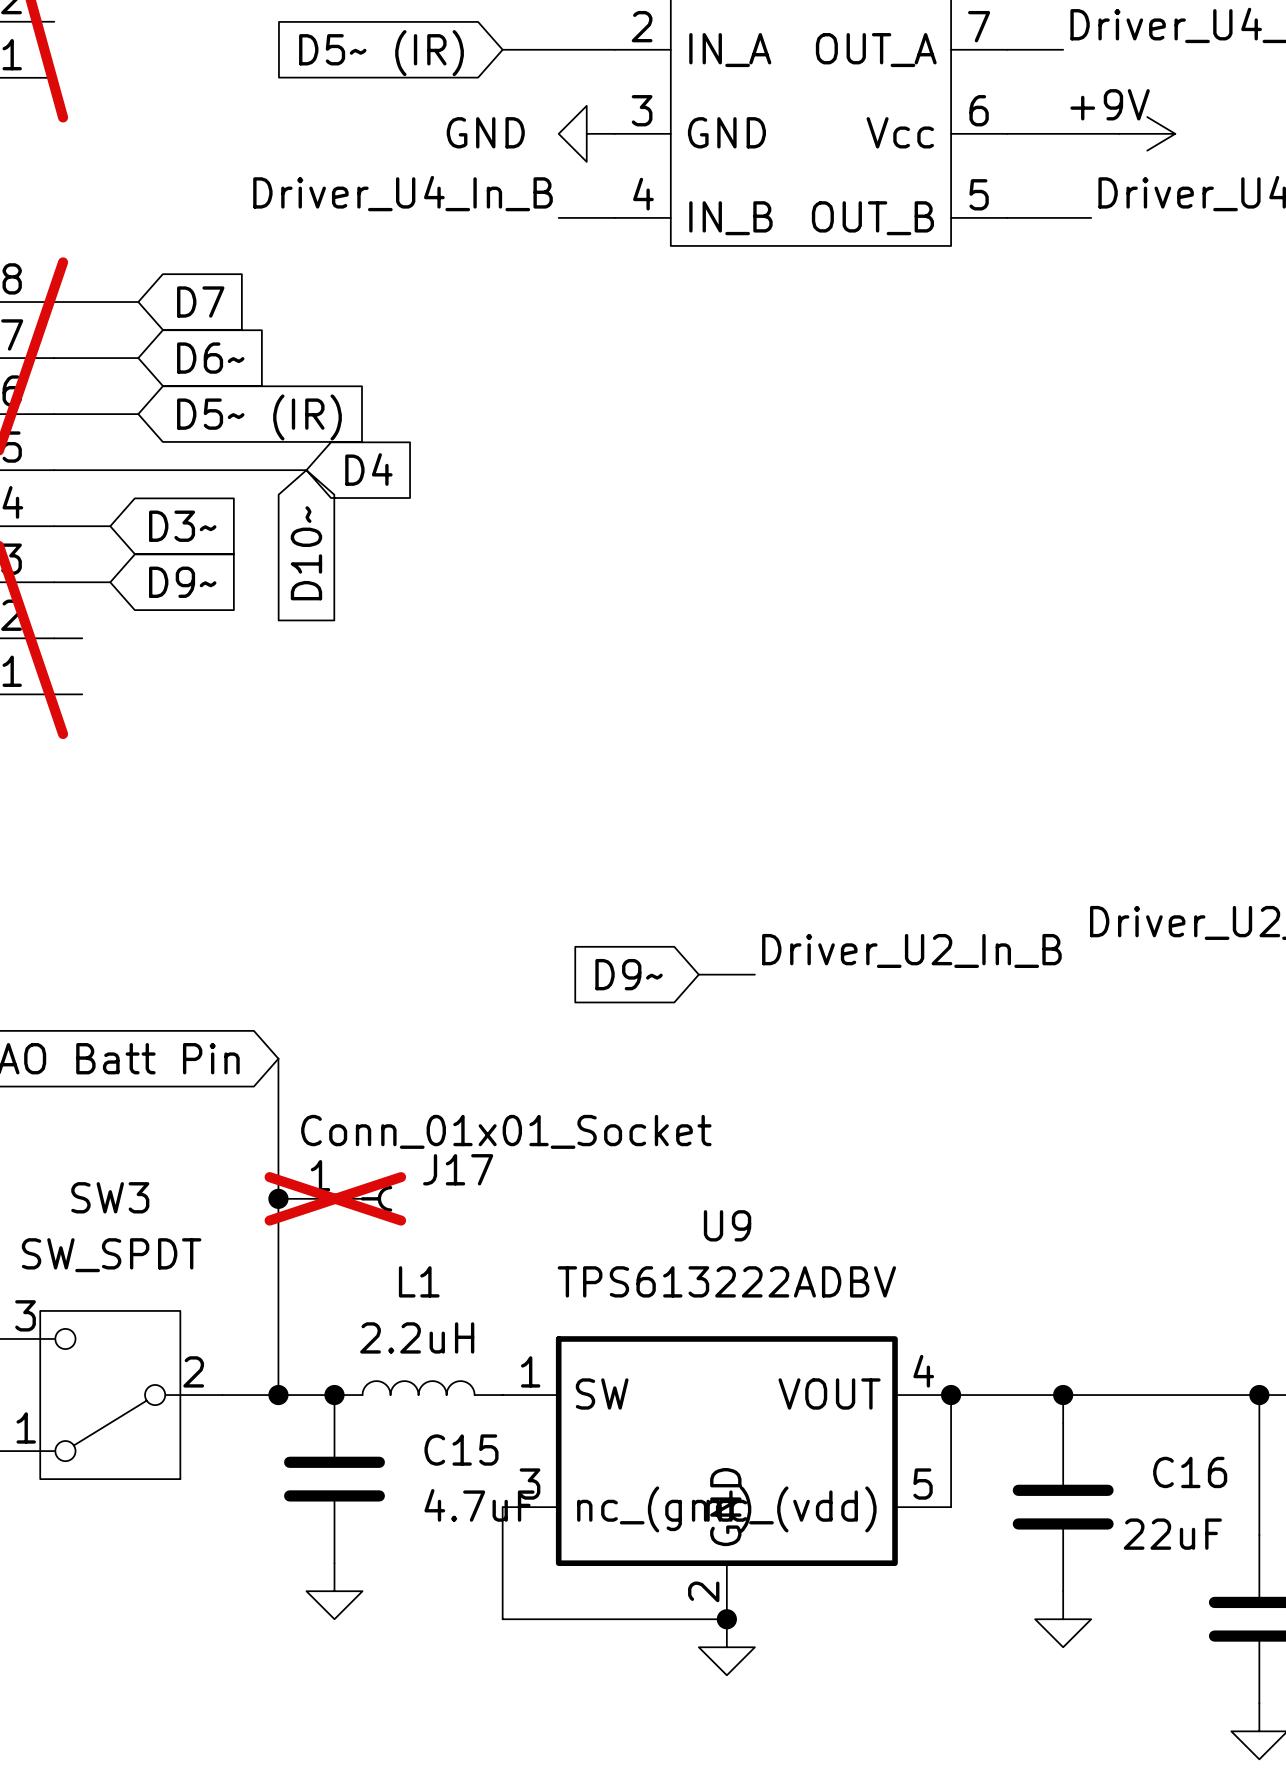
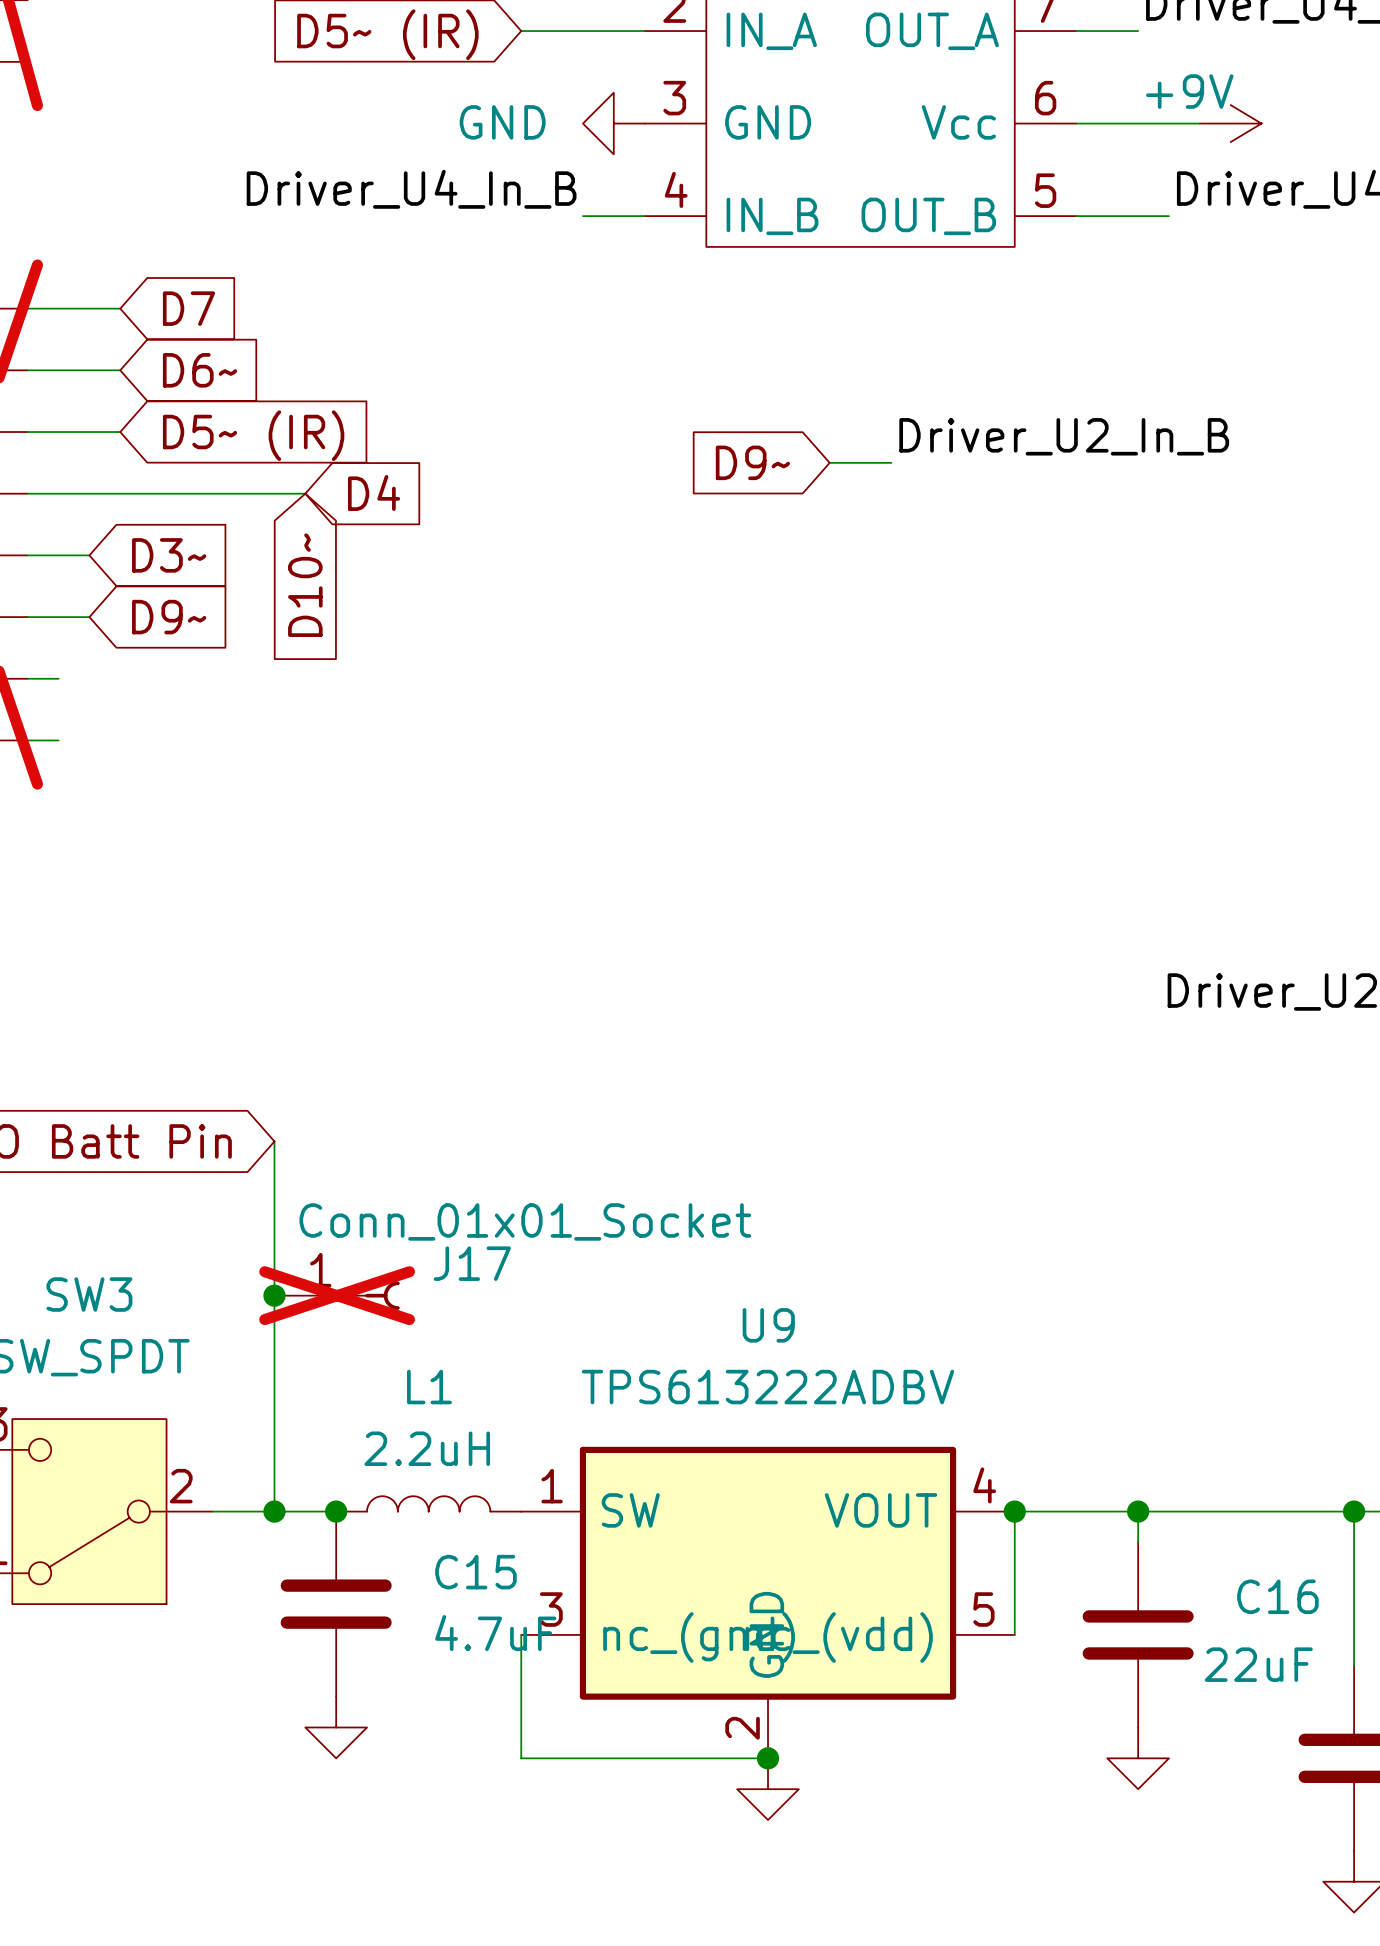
label position: Driver_U2_In_B (911, 950) -> Driver_U2_In_B (1064, 436)
global label position: D9~ (629, 974) -> D9~ (752, 462)
wire: (698, 974) (754, 974) -> (829, 462) (891, 462)

